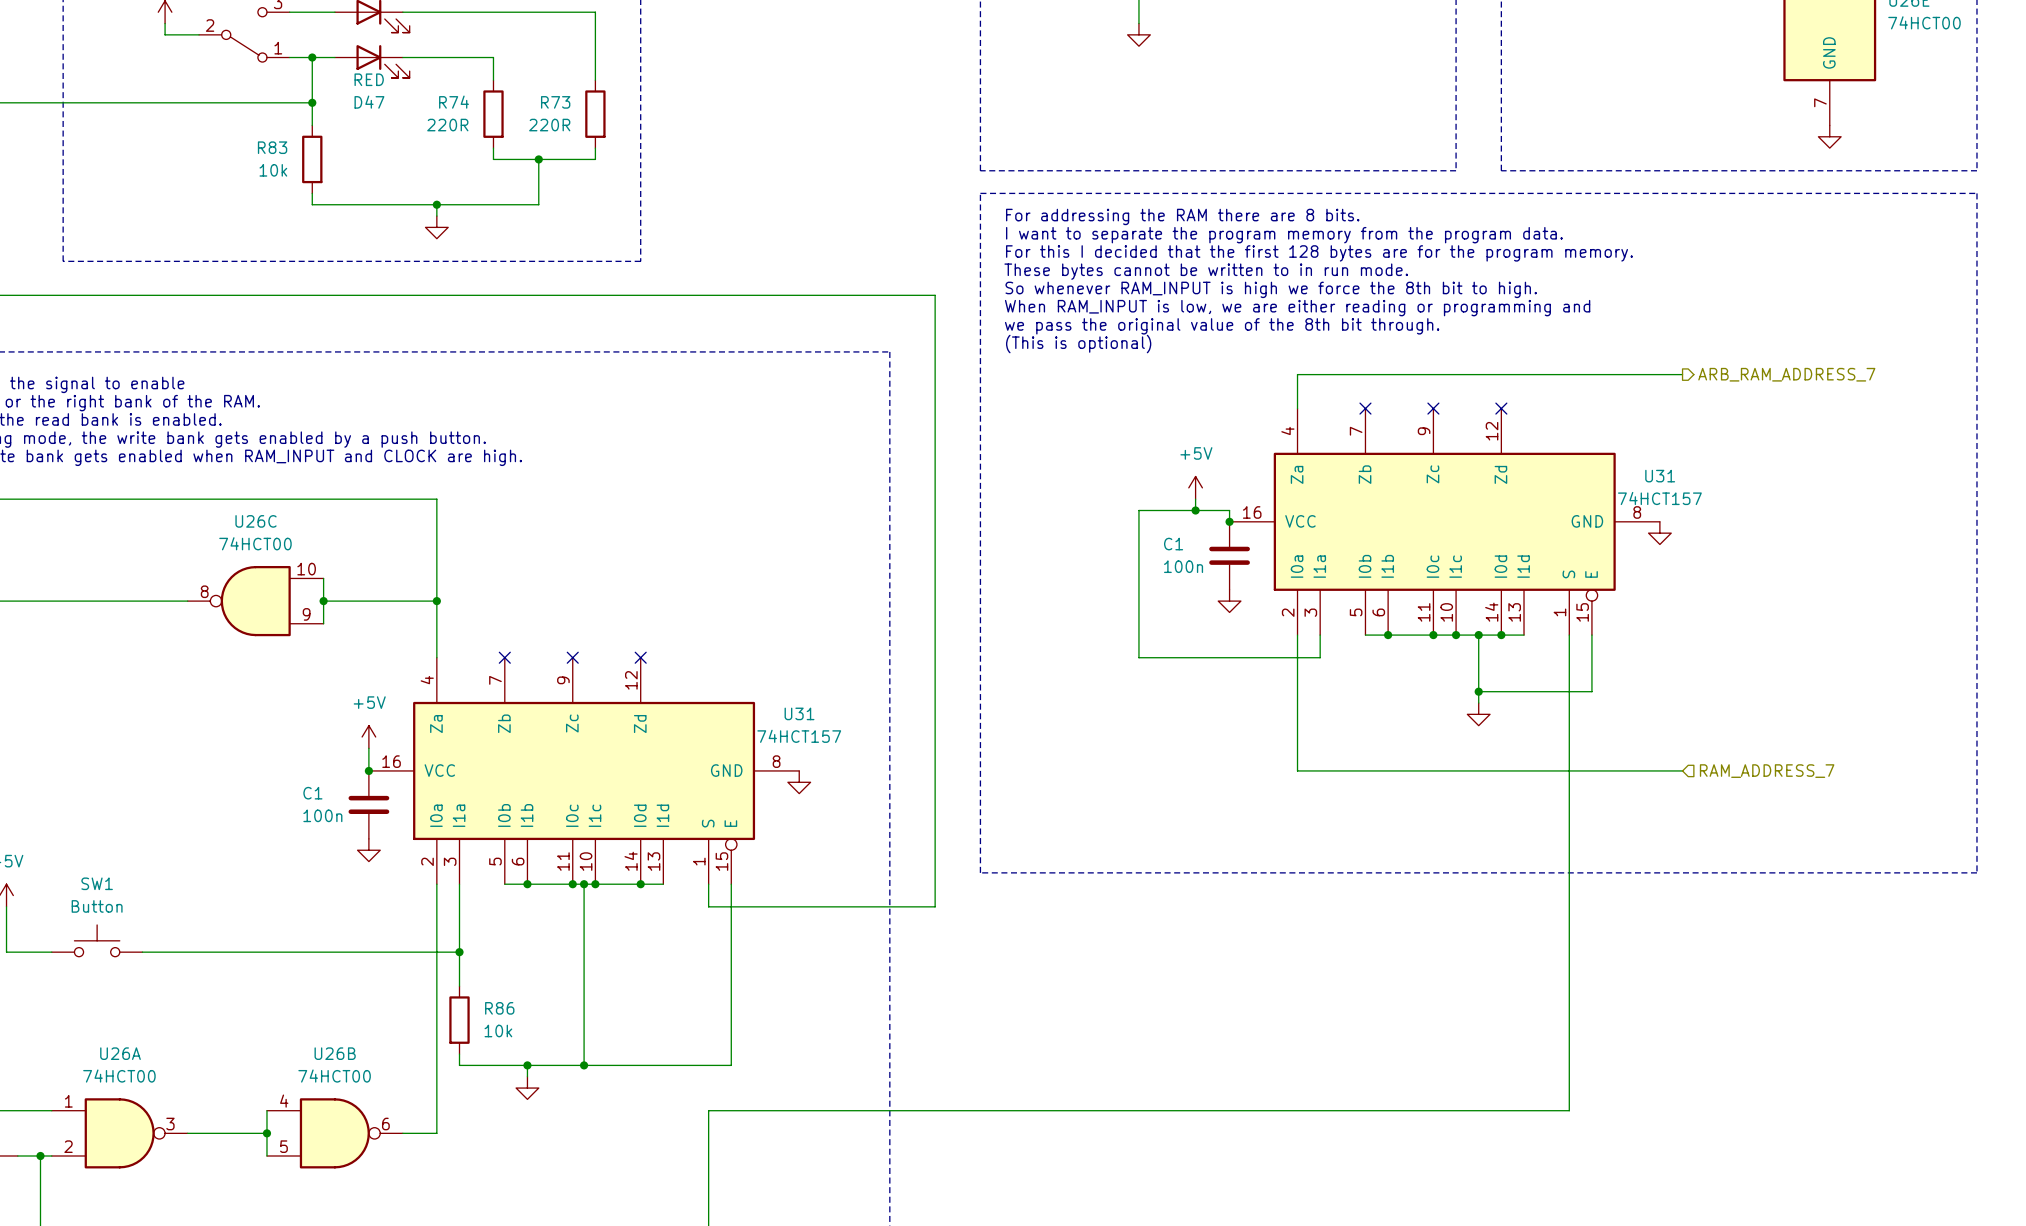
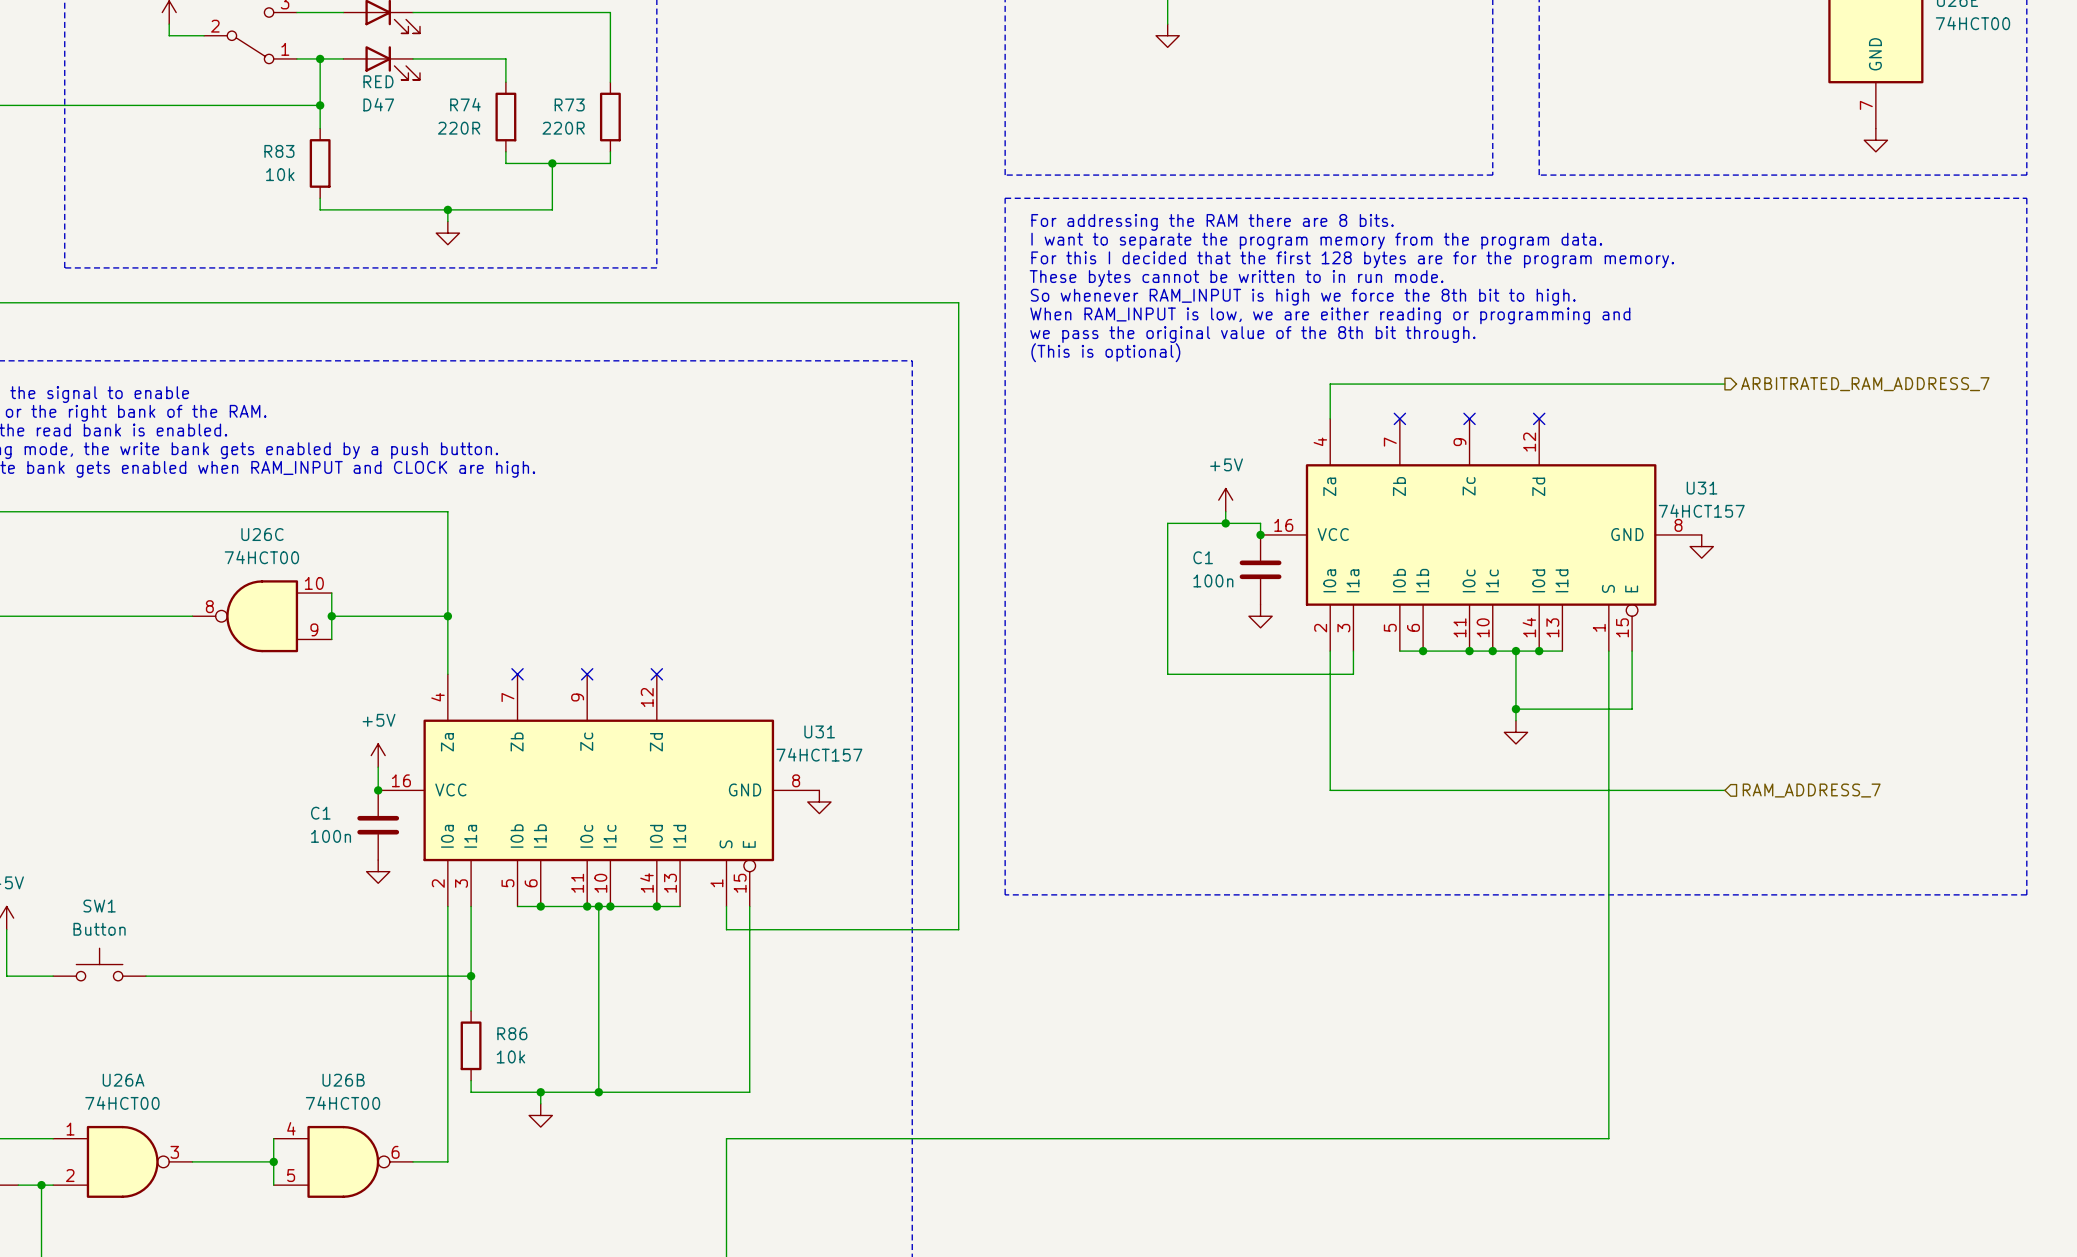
hierarchical label: ARB_RAM_ADDRESS_7 (1786, 374) -> ARBITRATED_RAM_ADDRESS_7 (1865, 384)

